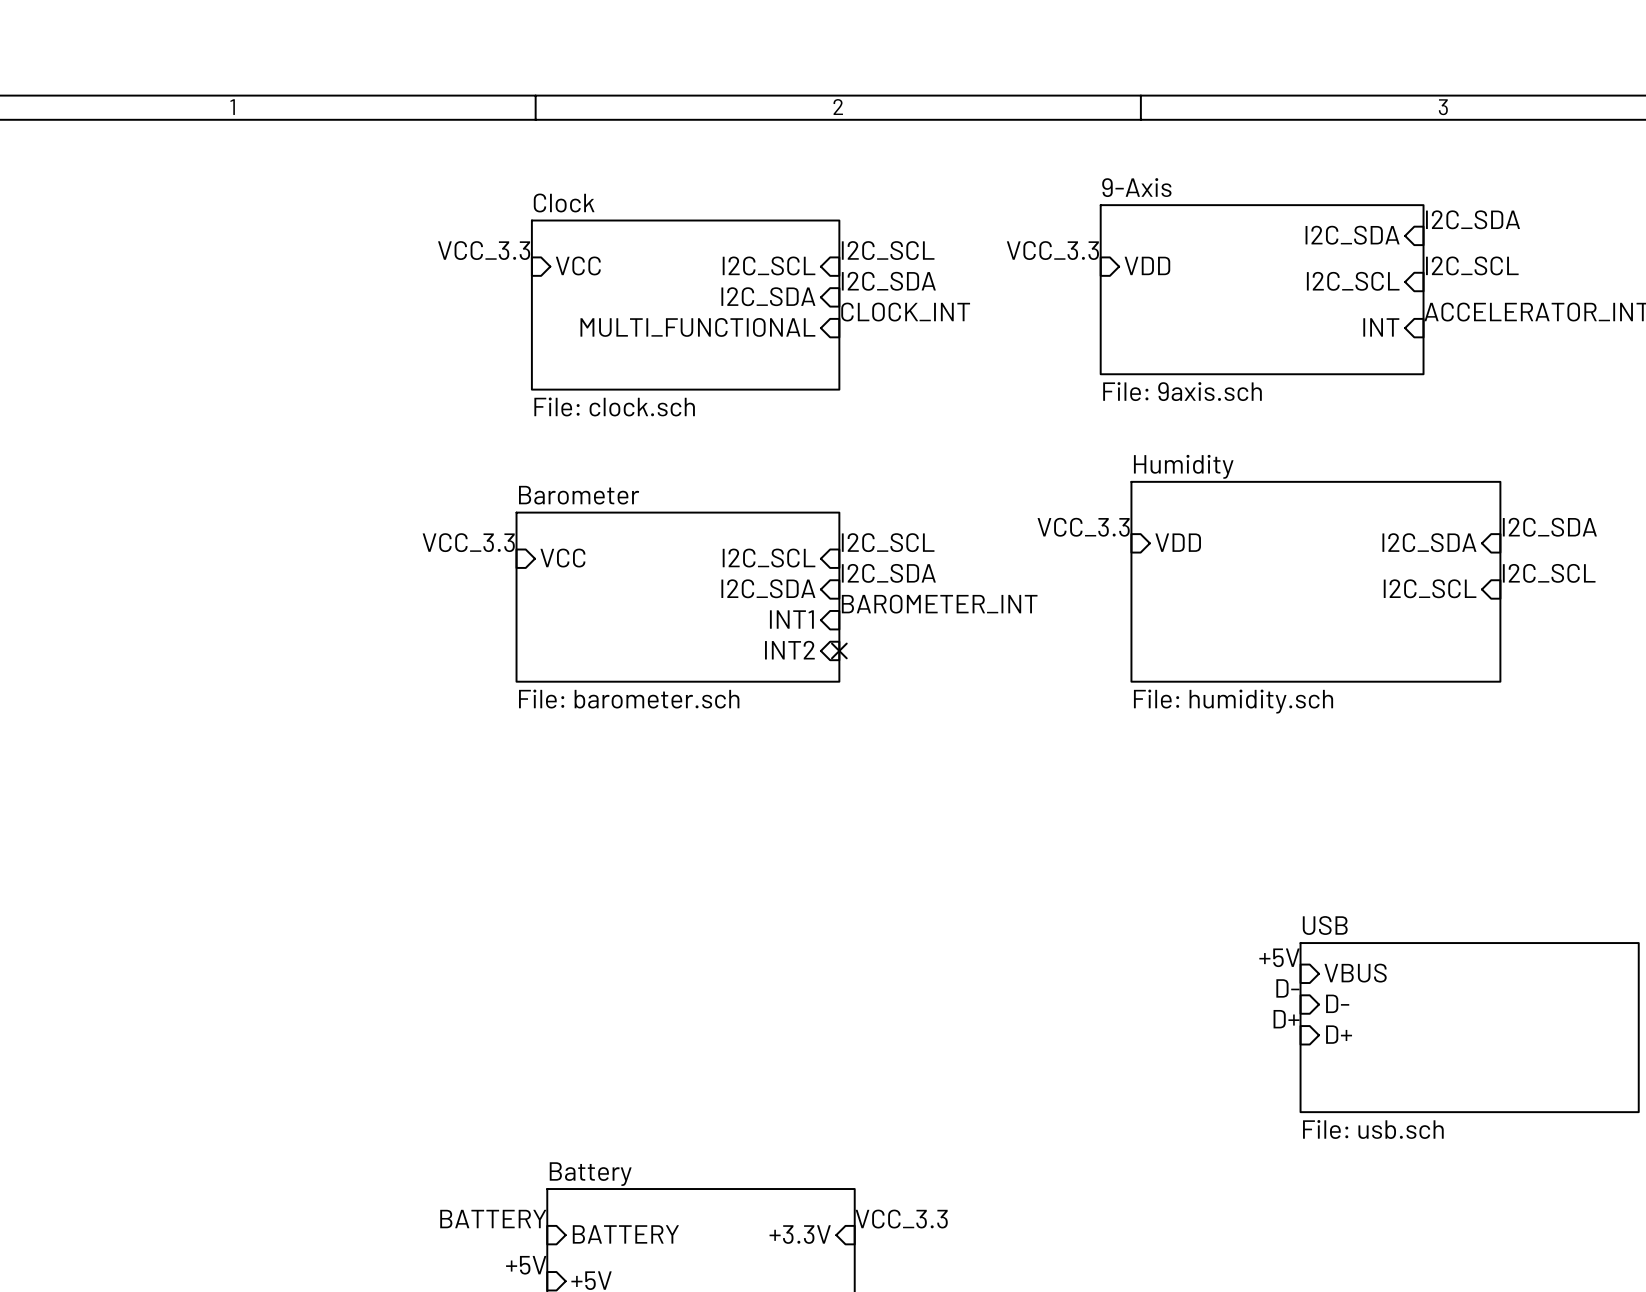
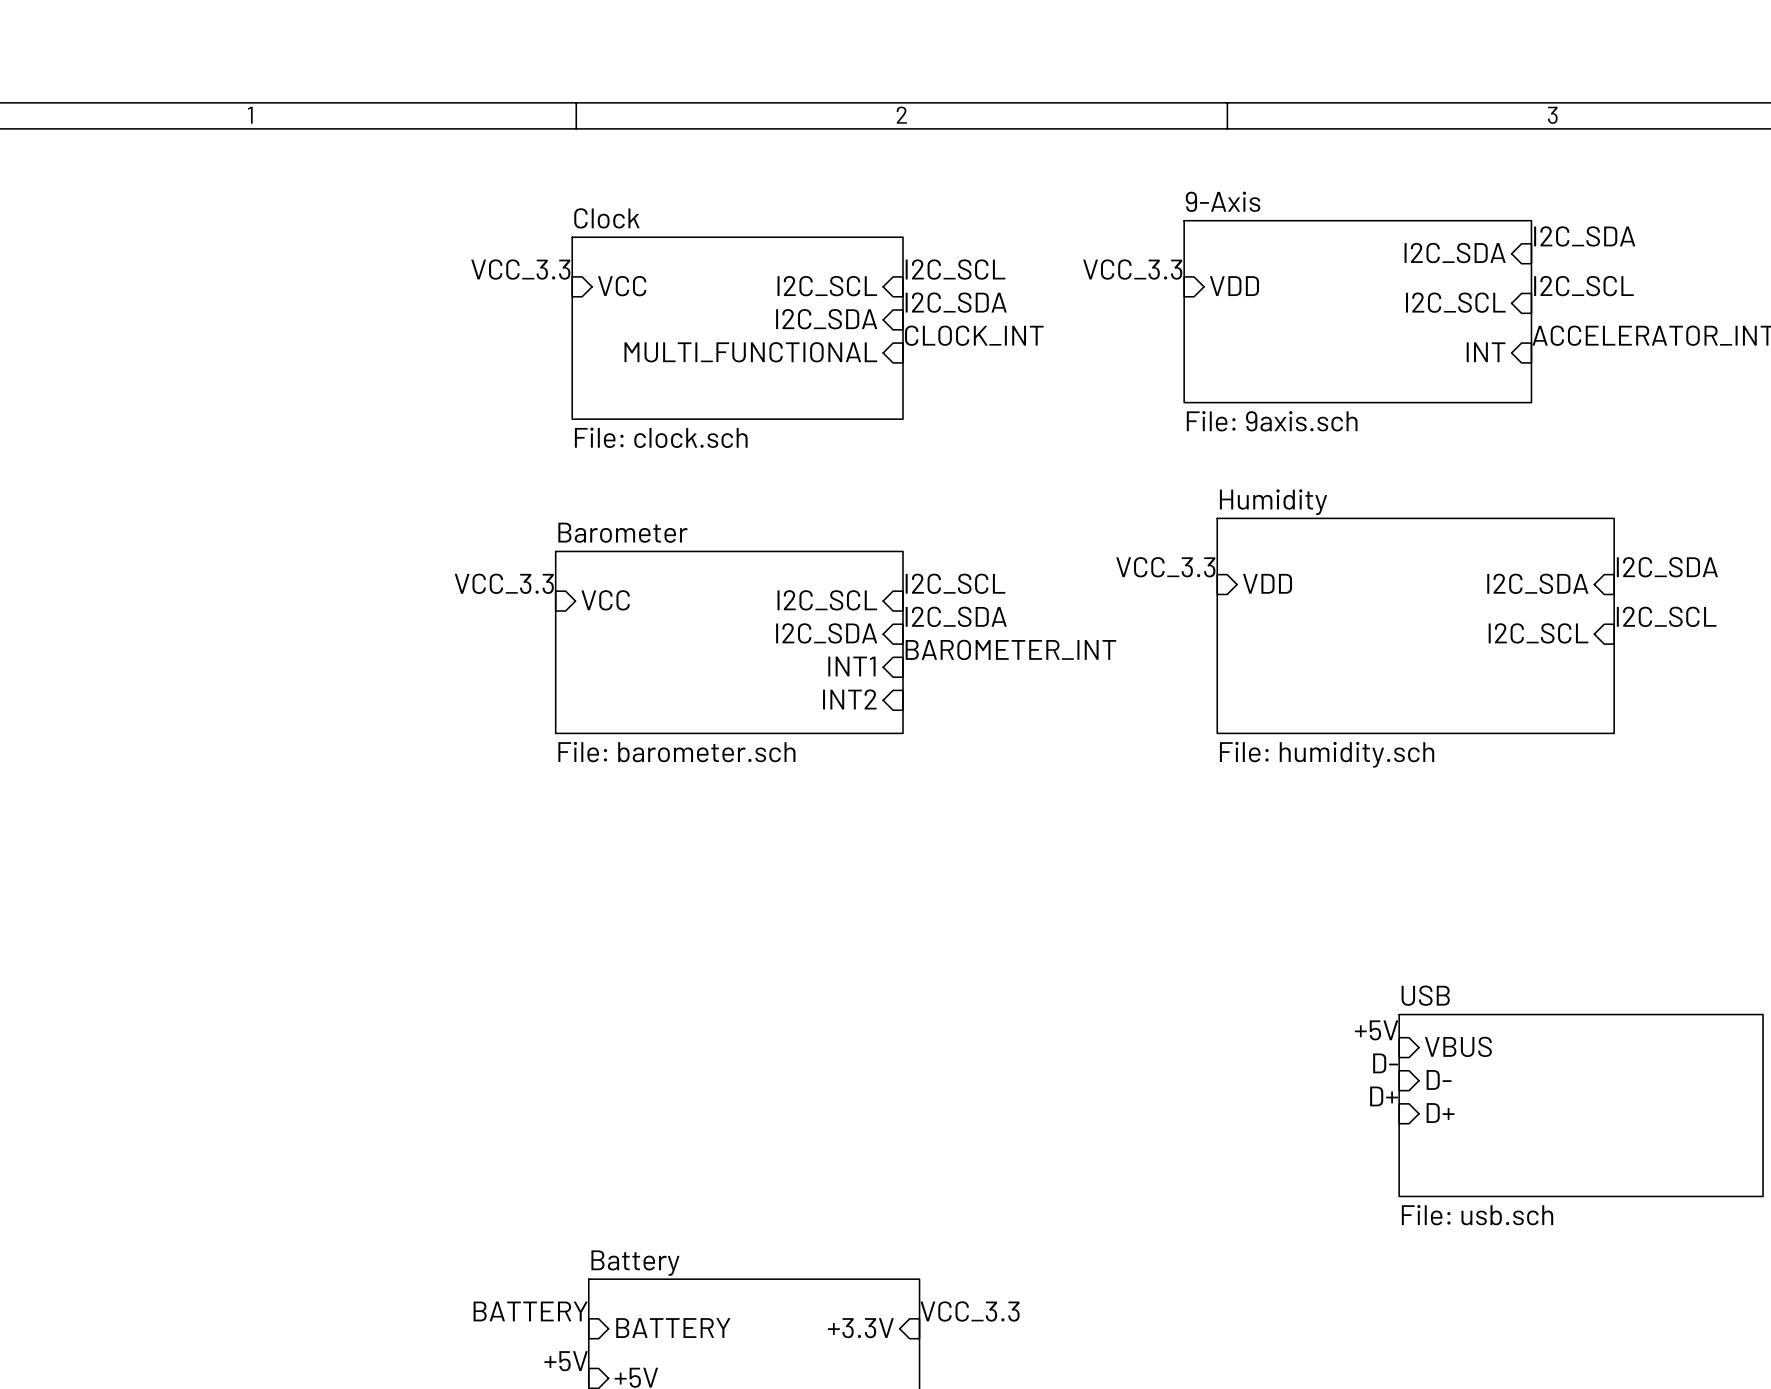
no-connect mark: (839, 650) -> none

